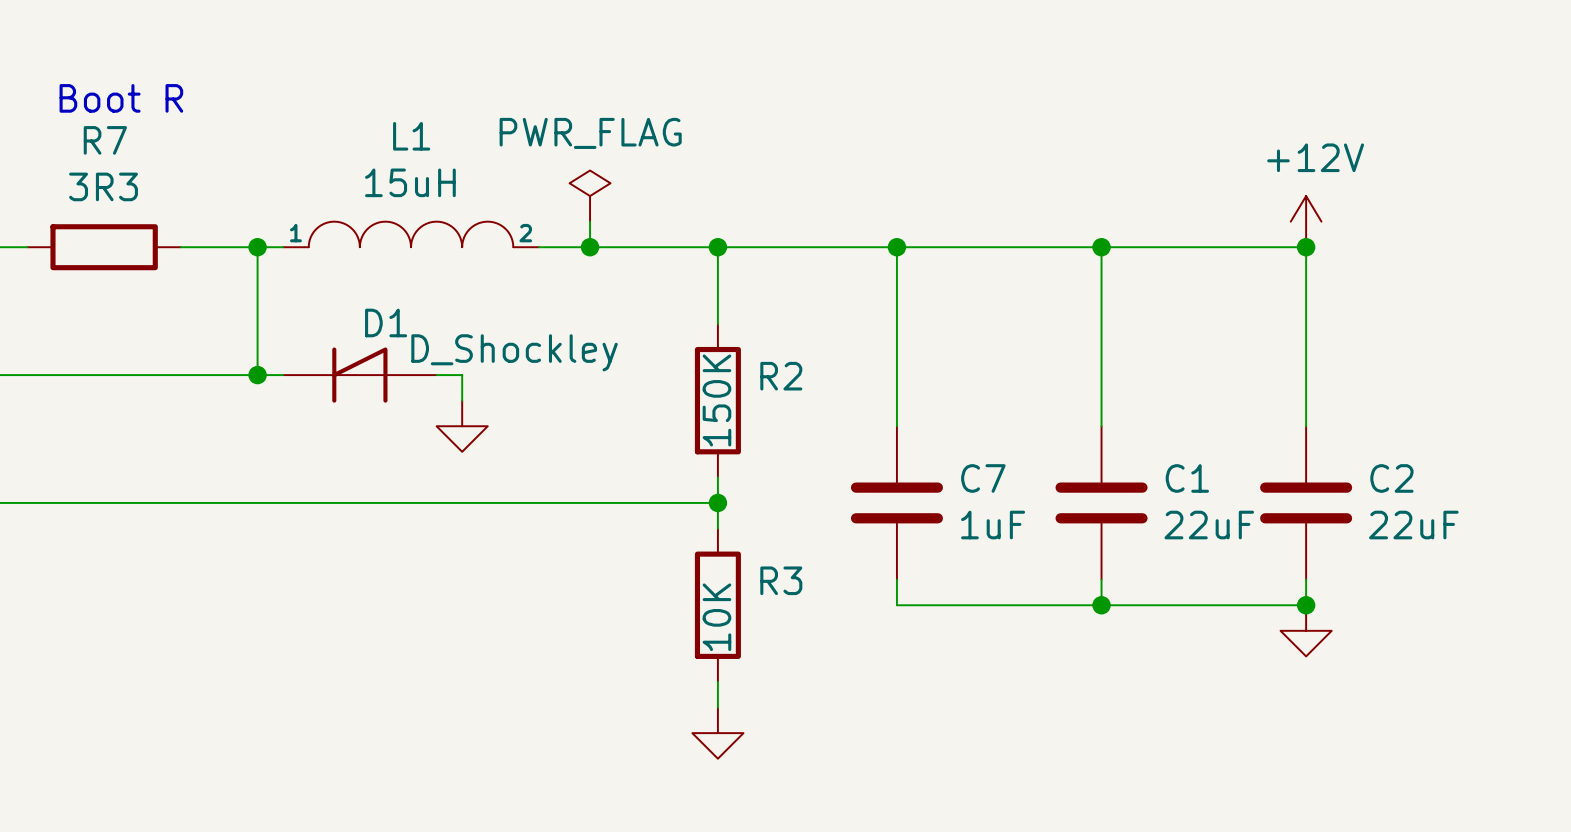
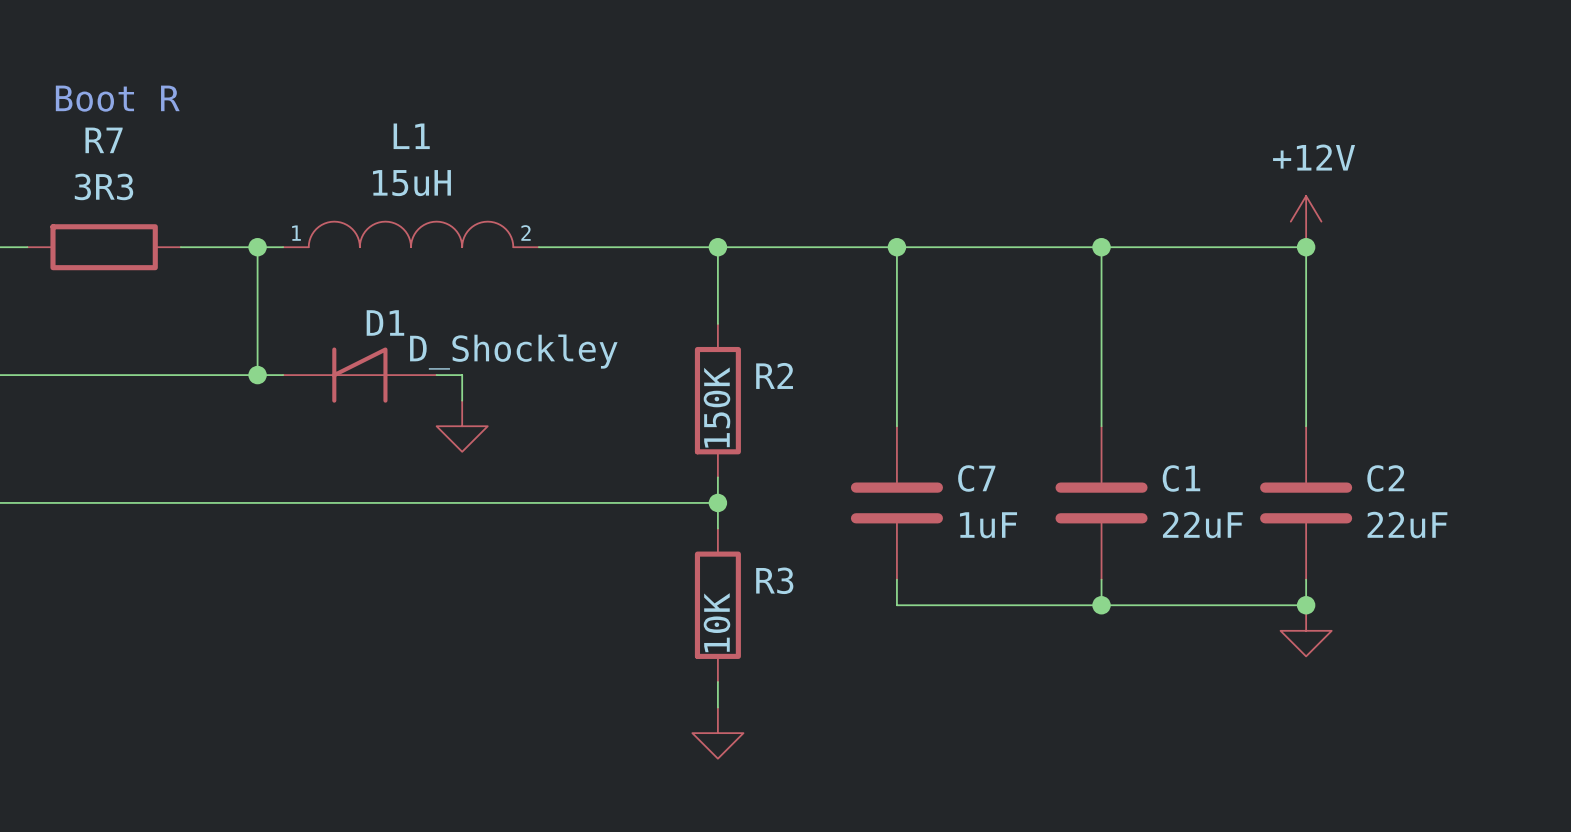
power symbol: PWR_FLAG (590, 196) -> none
wire: (590, 221) (590, 247) -> none
junction: (590, 247) -> none

